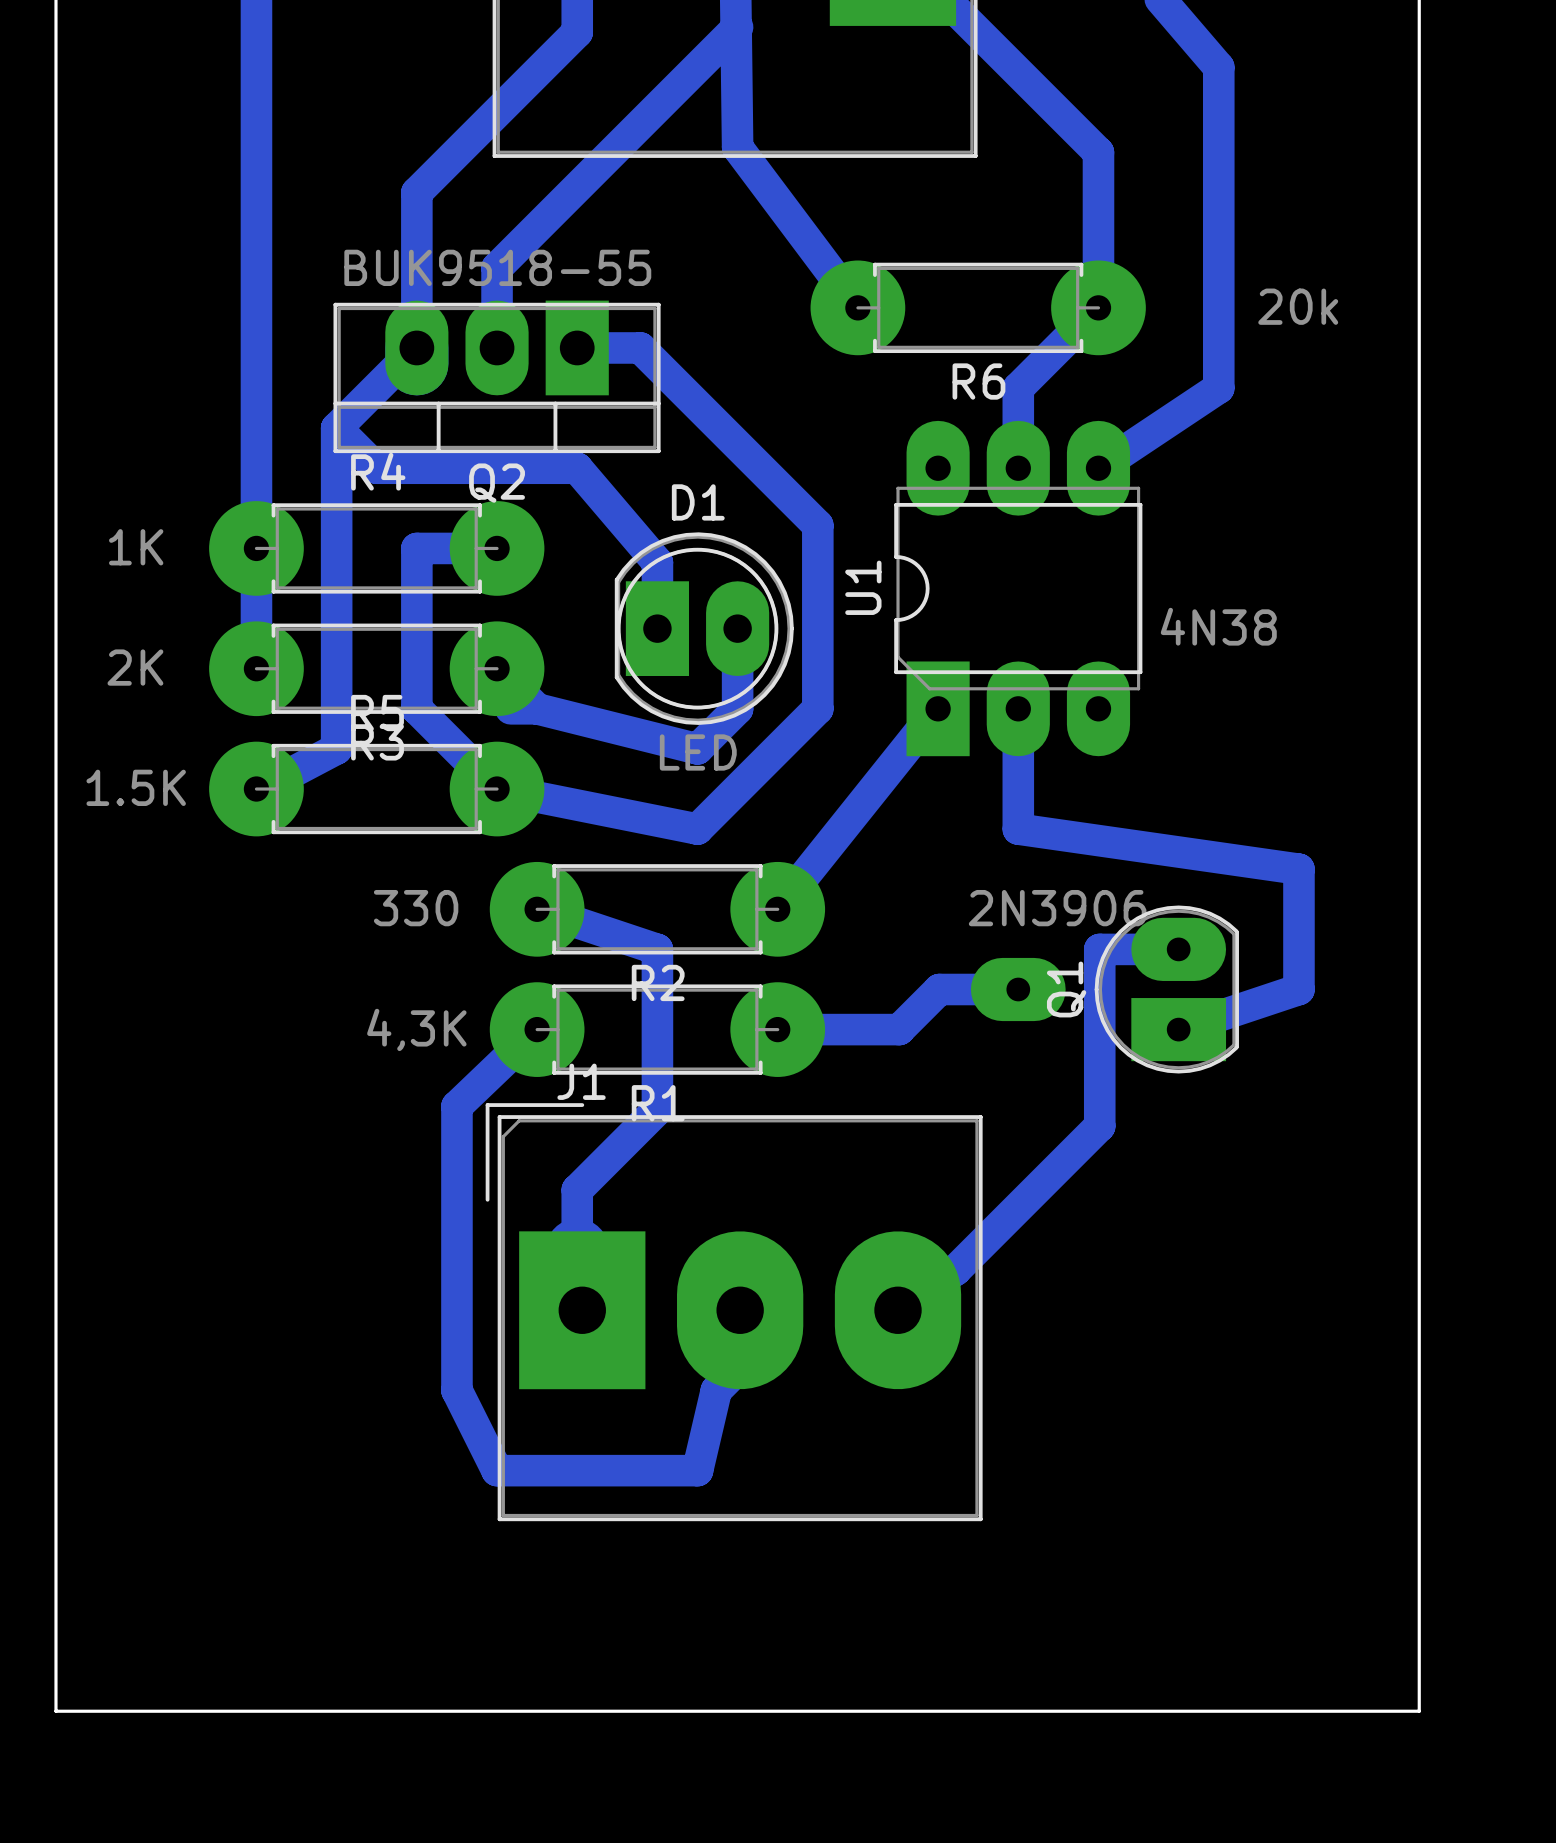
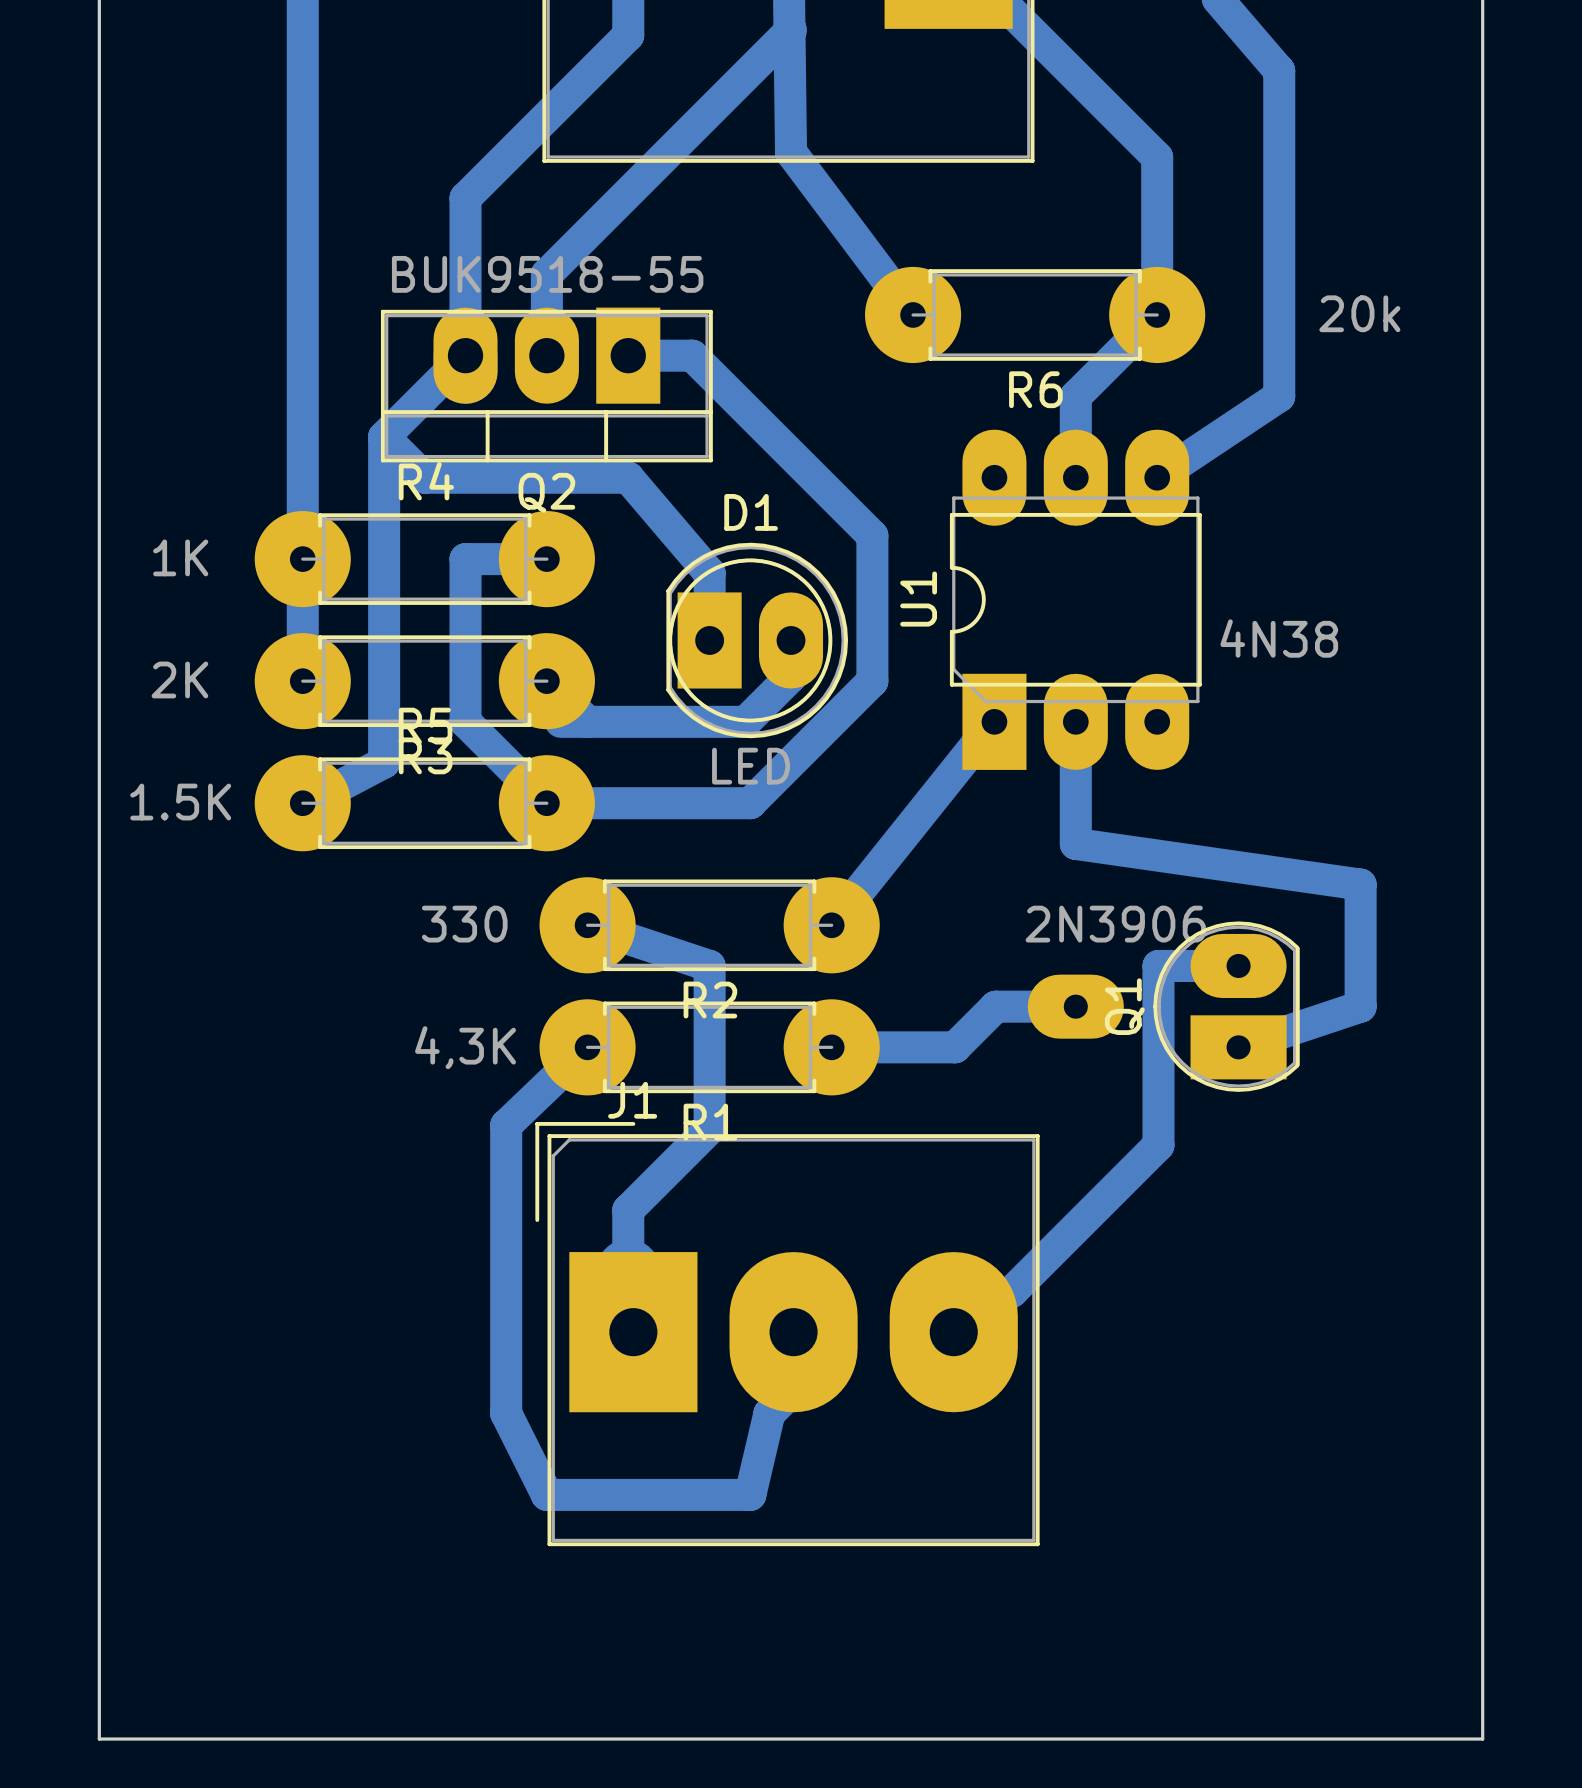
bottom track: (737, 664) (737, 708) (697, 748) (537, 708) -> (791, 676) (745, 721) (587, 721)
bottom track: (817, 668) (817, 708) (697, 829) (497, 789) -> (872, 681) (750, 803) (546, 803)

